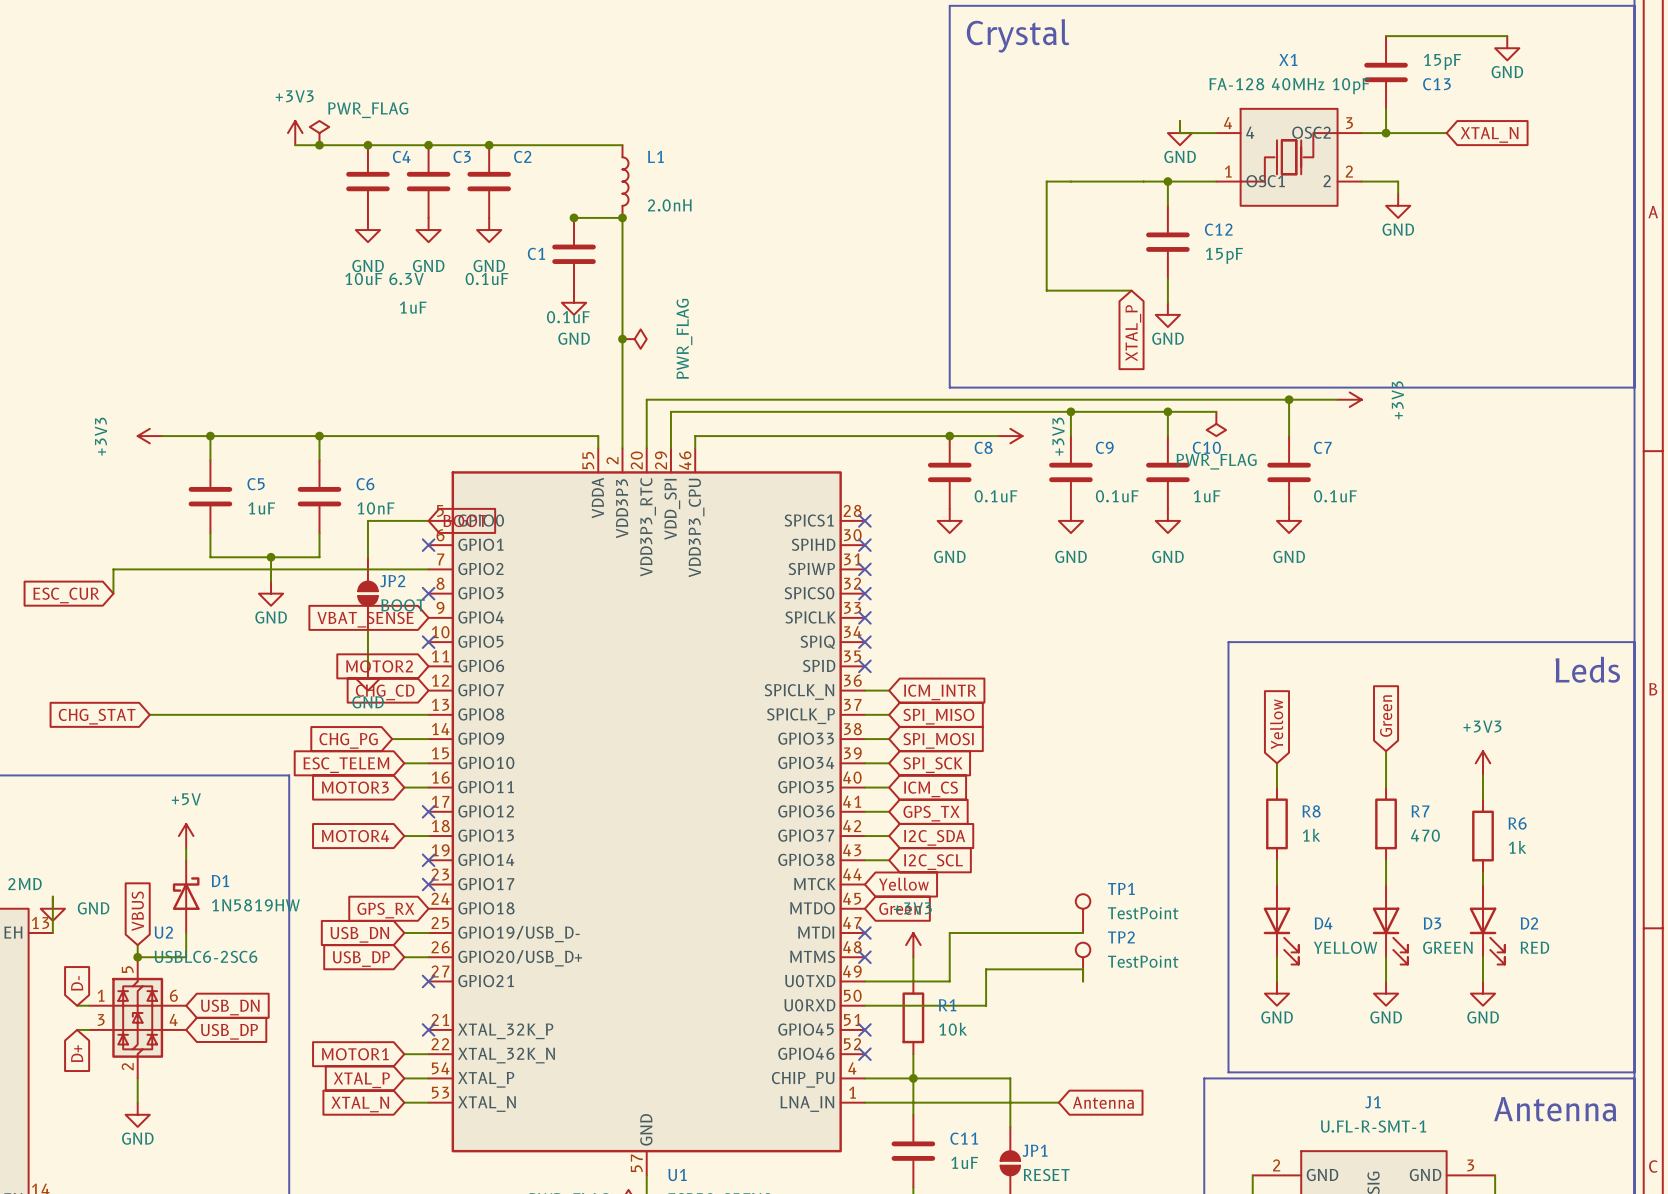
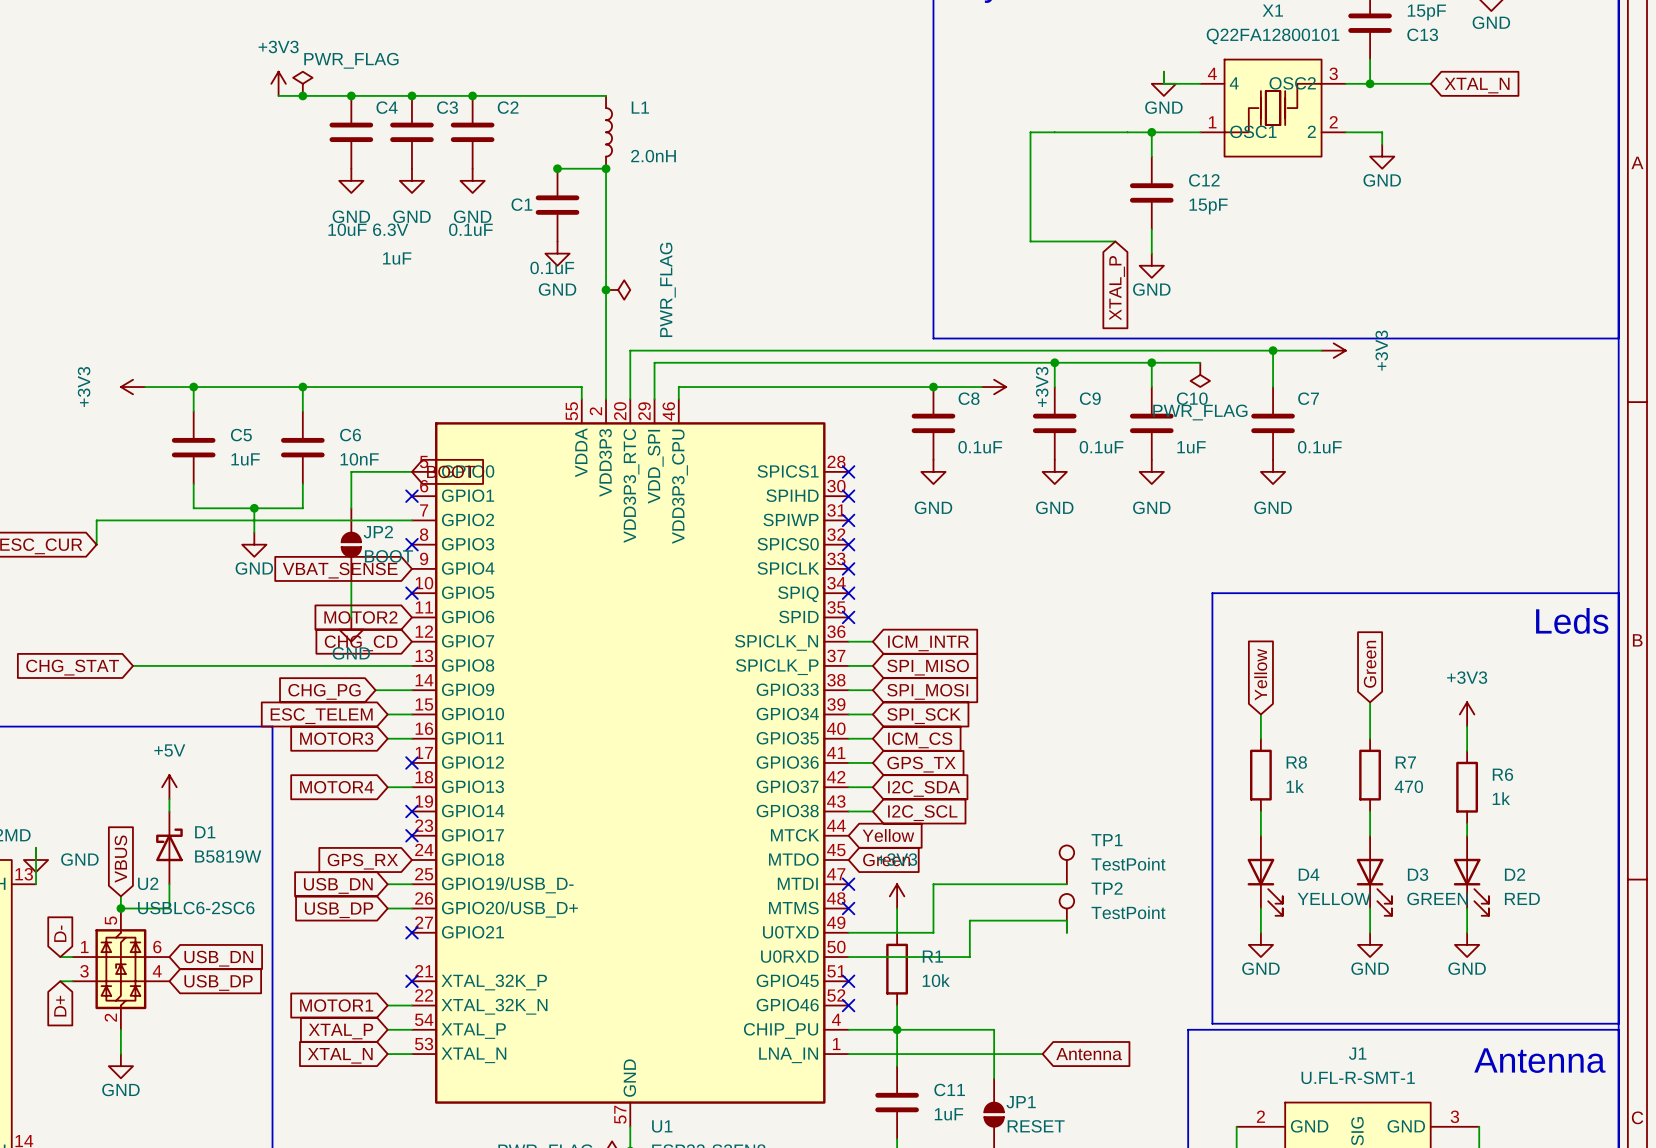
X1 value: FA-128 40MHz 10pF (1289, 86) -> Q22FA12800101 (1273, 36)
D1 value: 1N5819HW (255, 905) -> B5819W (228, 856)

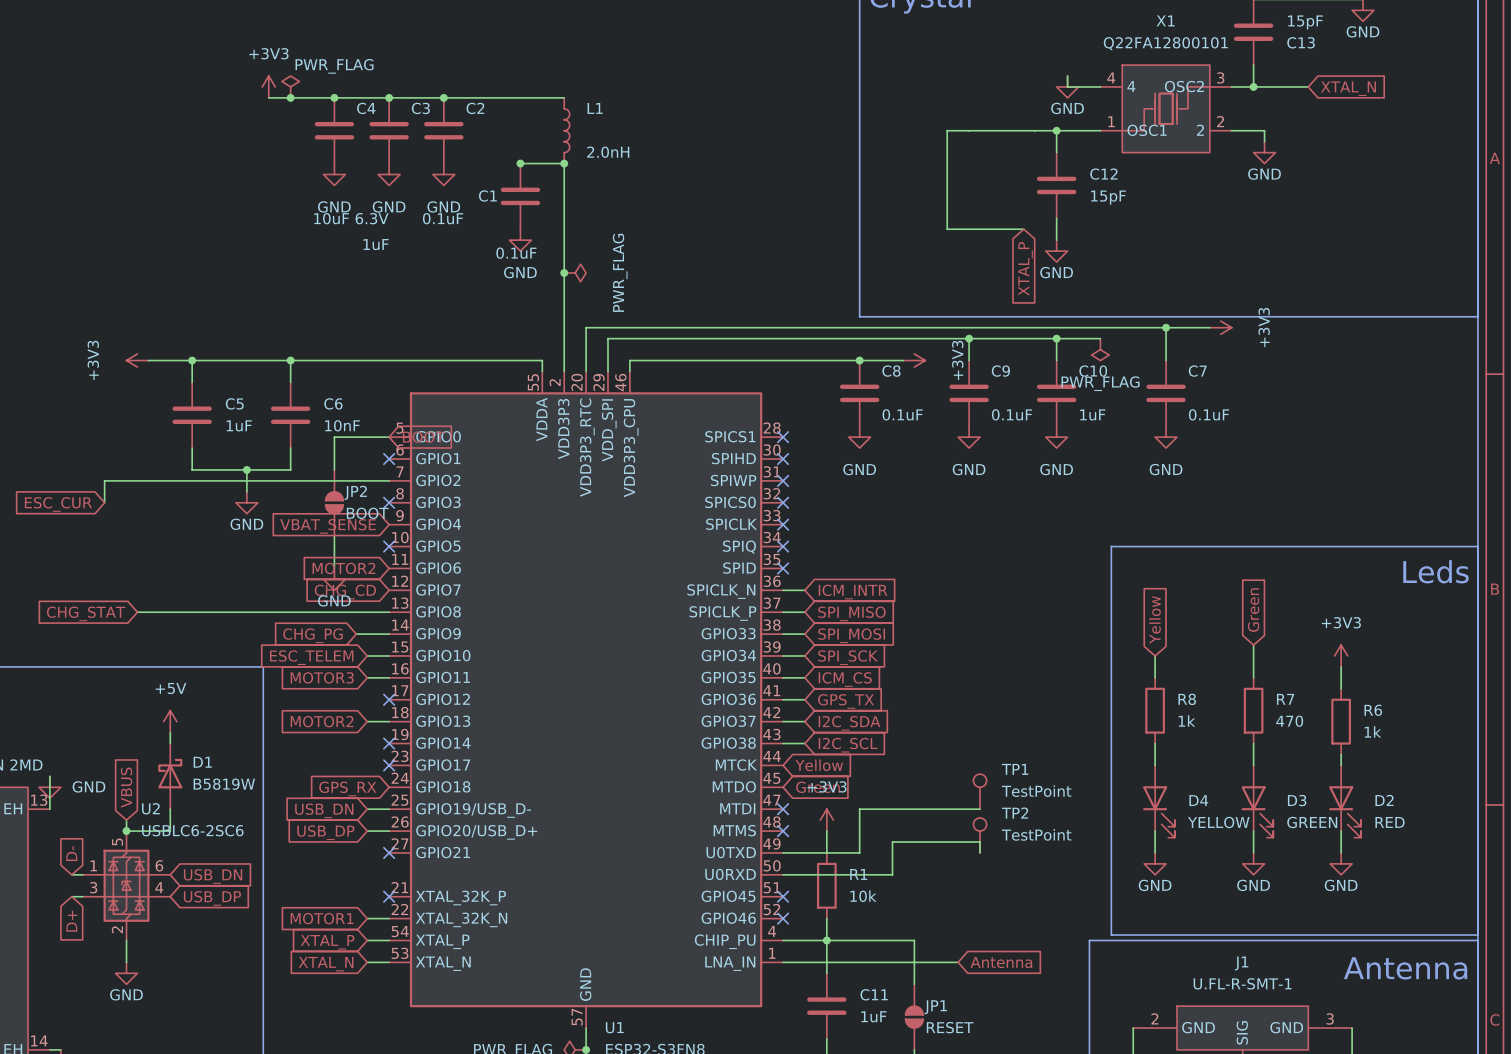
global label: MOTOR4 (336, 787) -> MOTOR2 (322, 721)

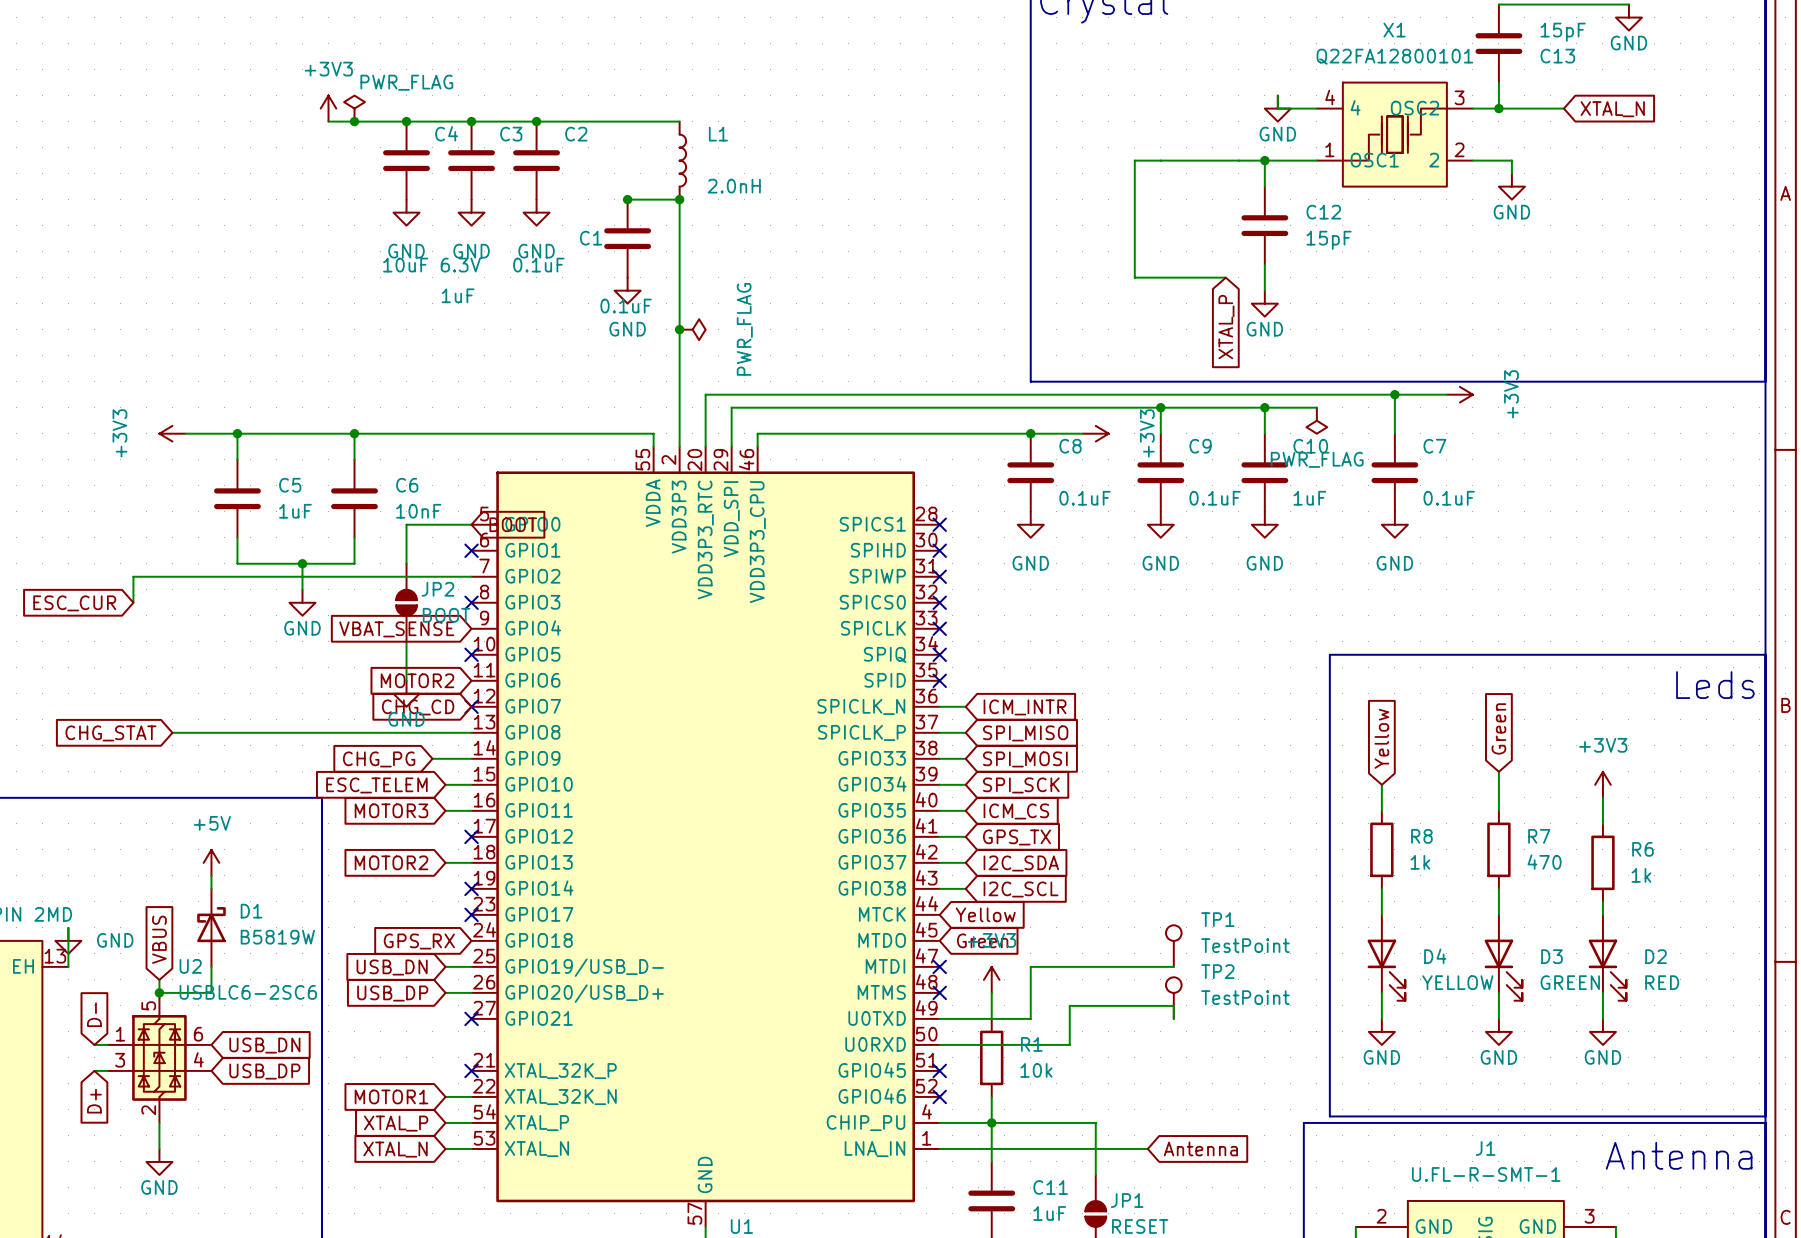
no-connect mark: none -> (471, 706)

